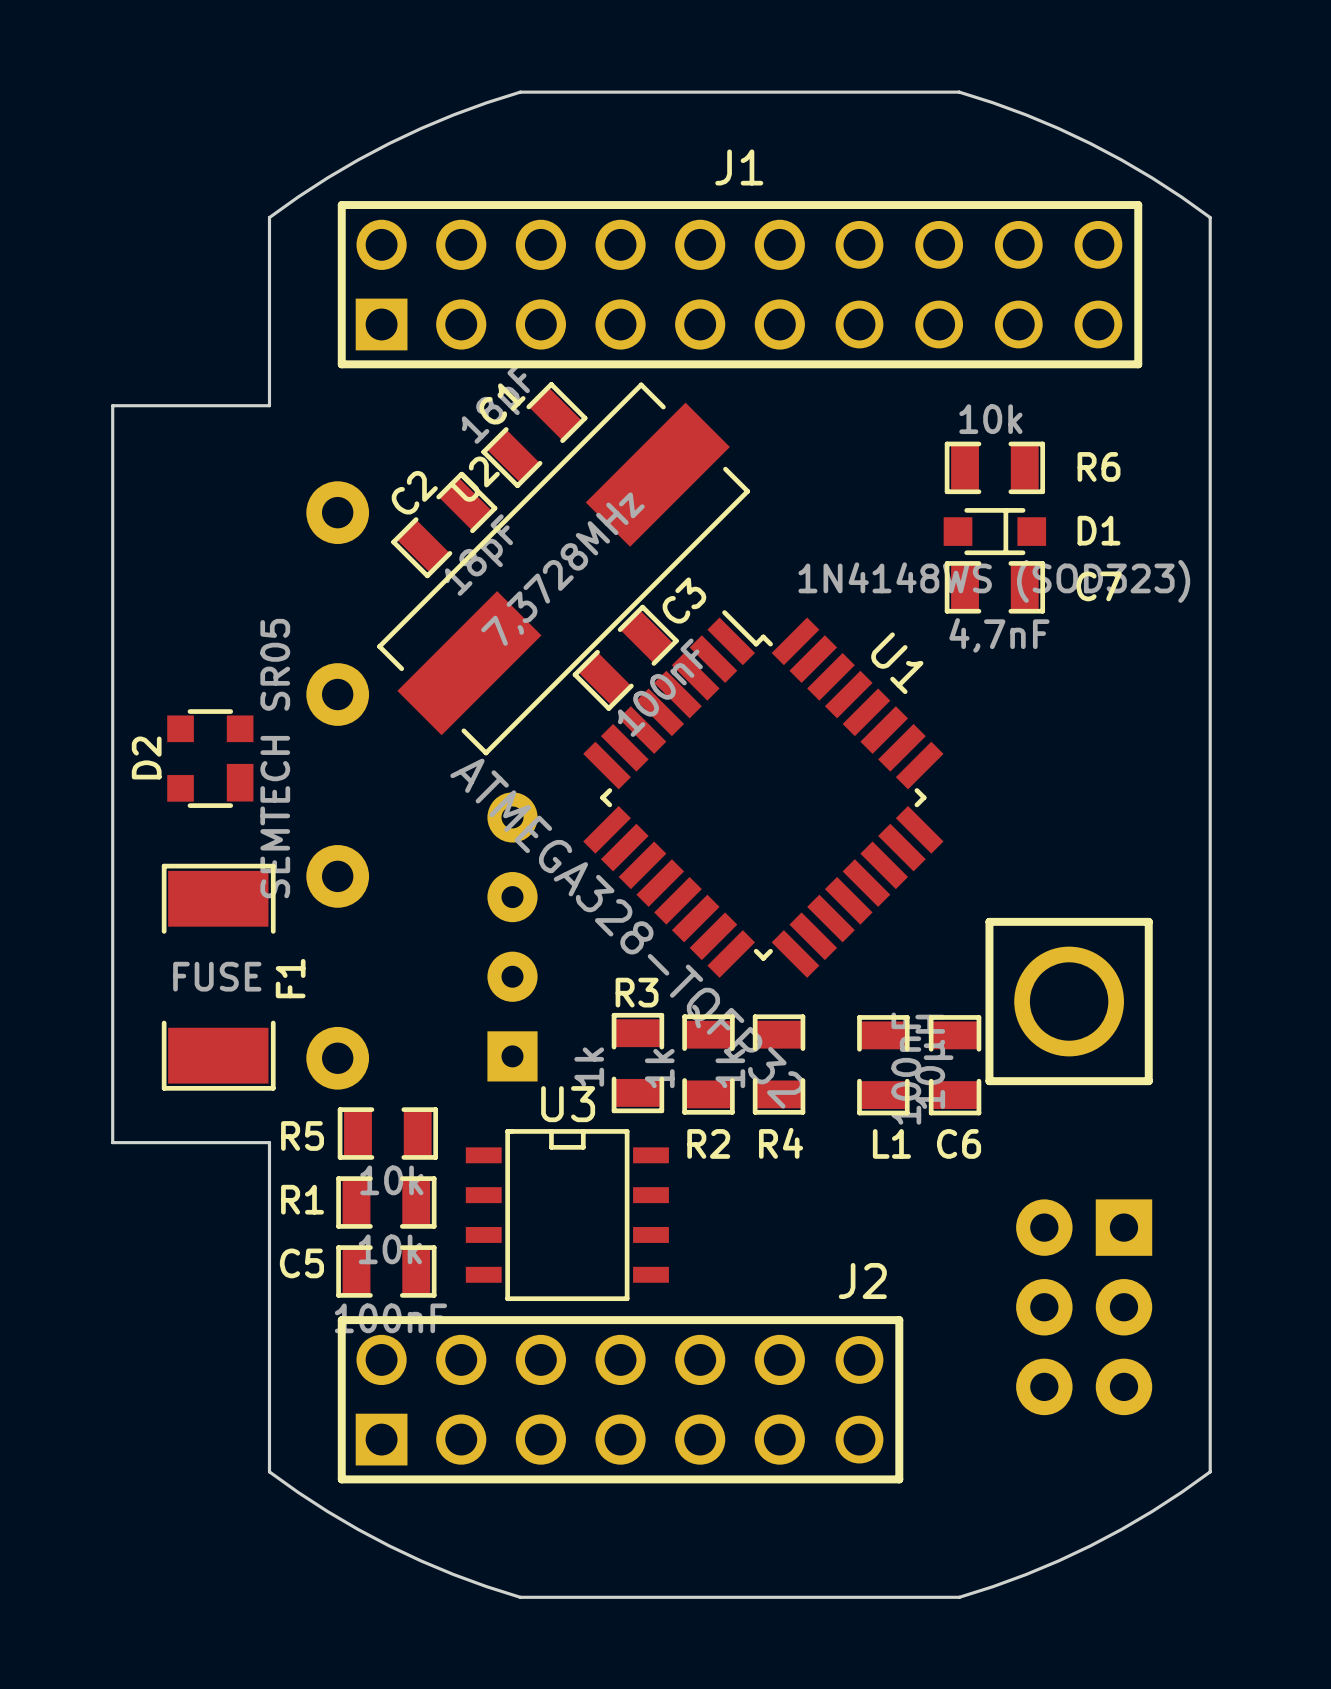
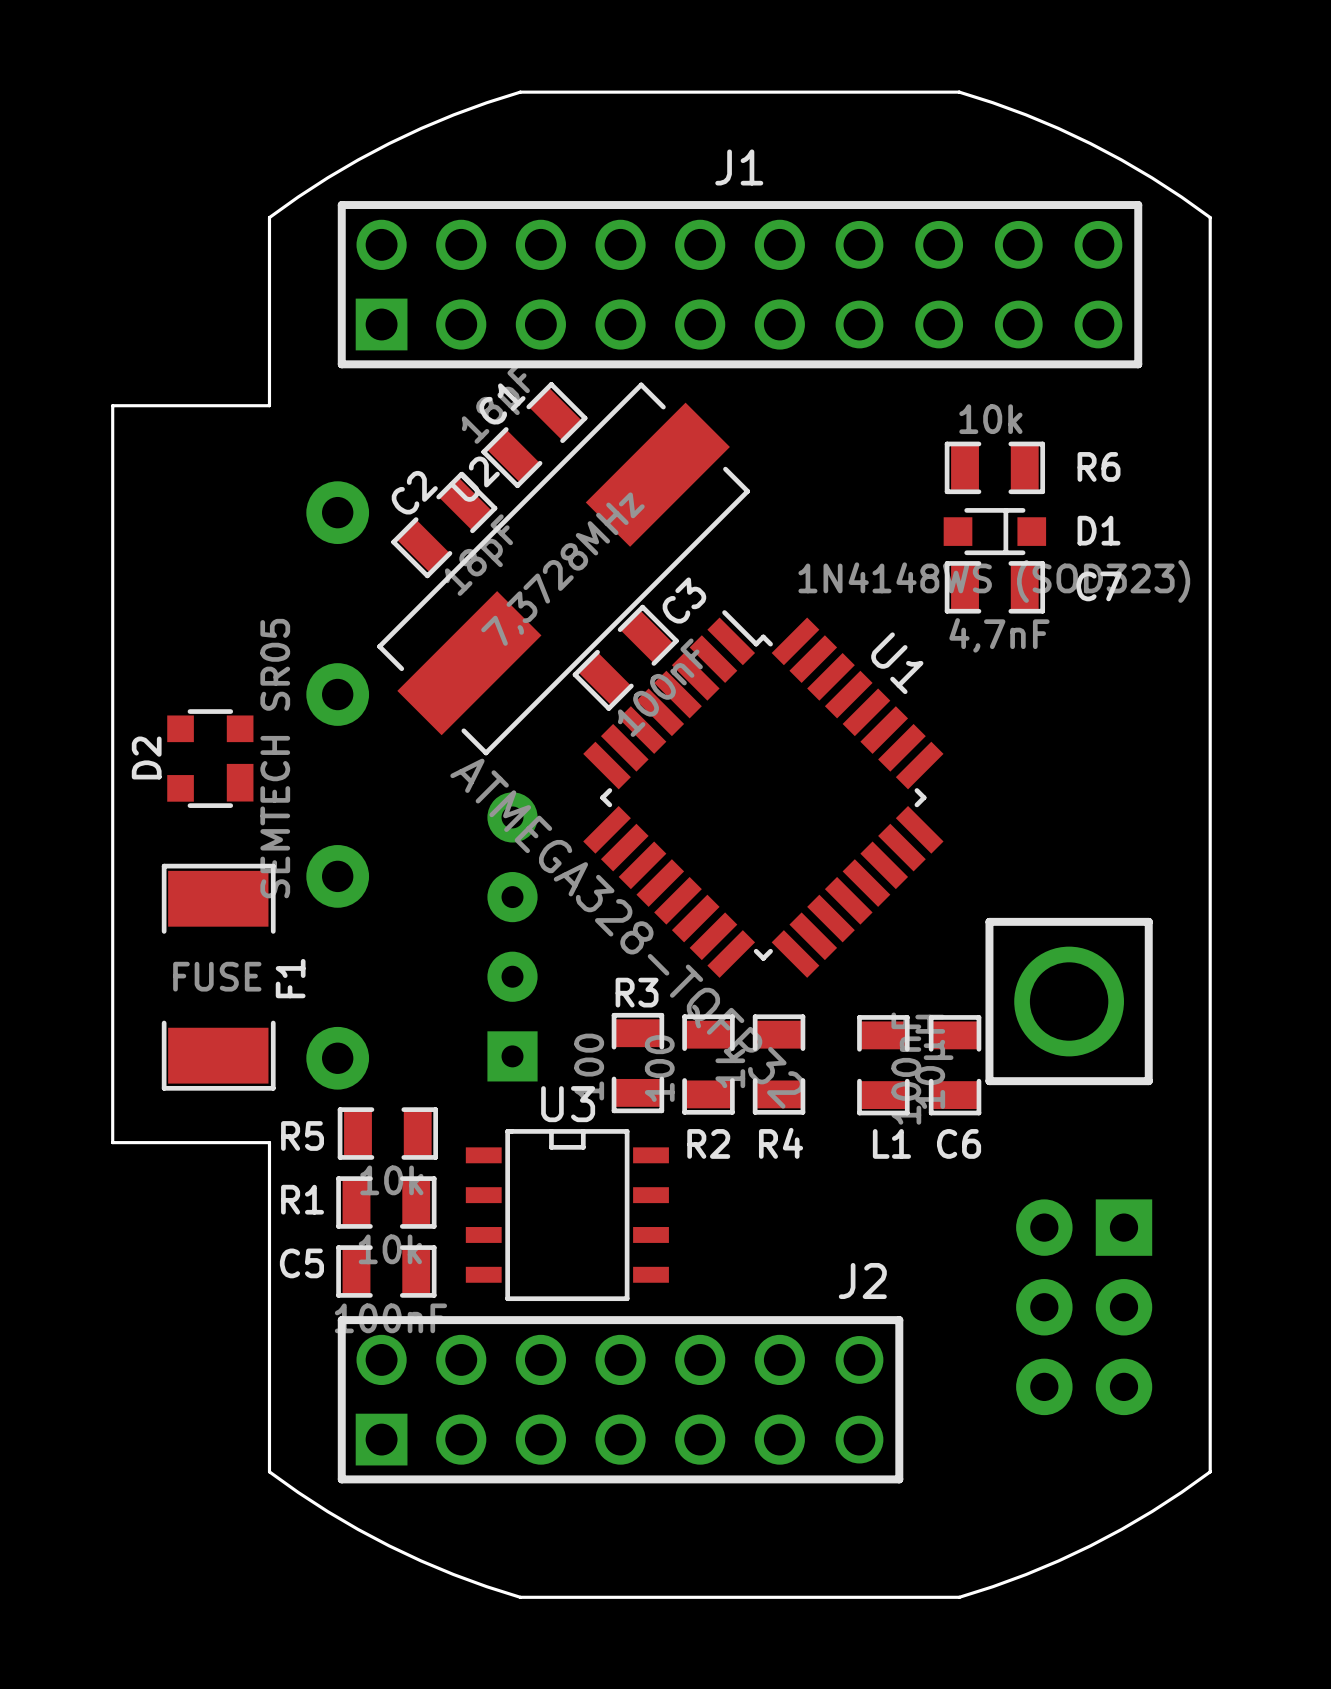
R3 value: 1k (589, 1067) -> 100 (589, 1067)
R2 value: 1k (659, 1068) -> 100 (659, 1068)

